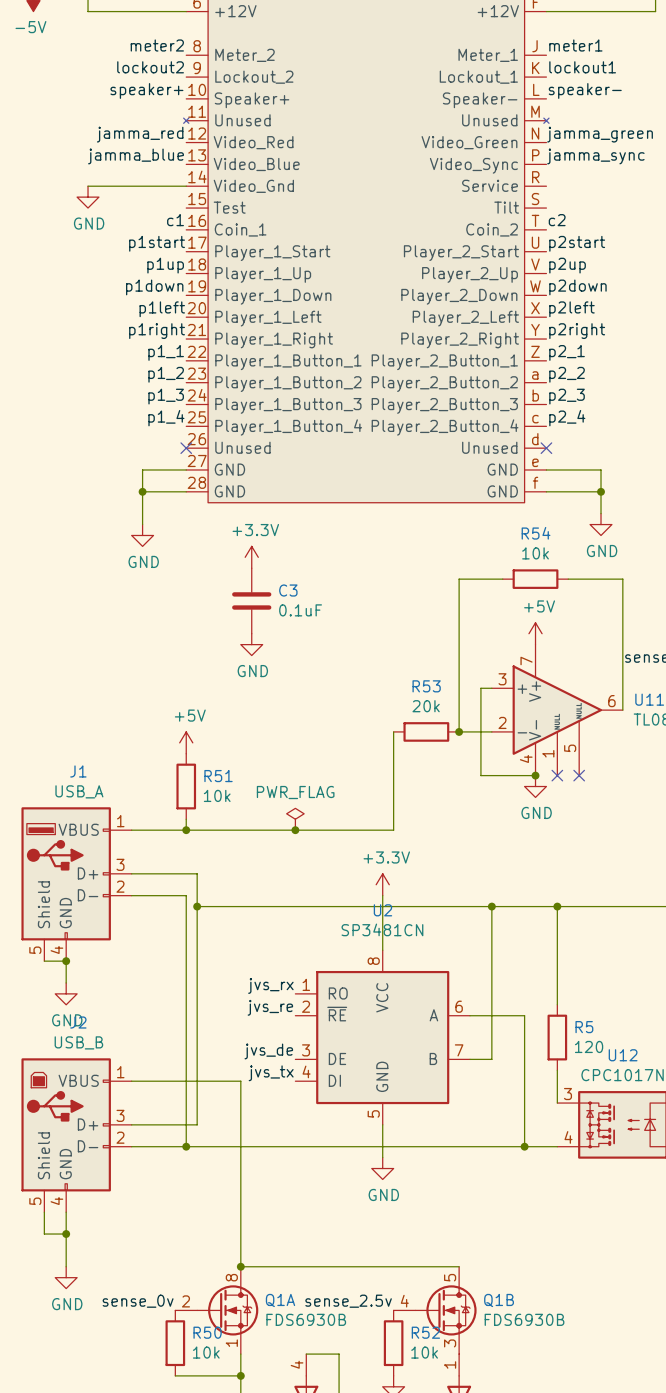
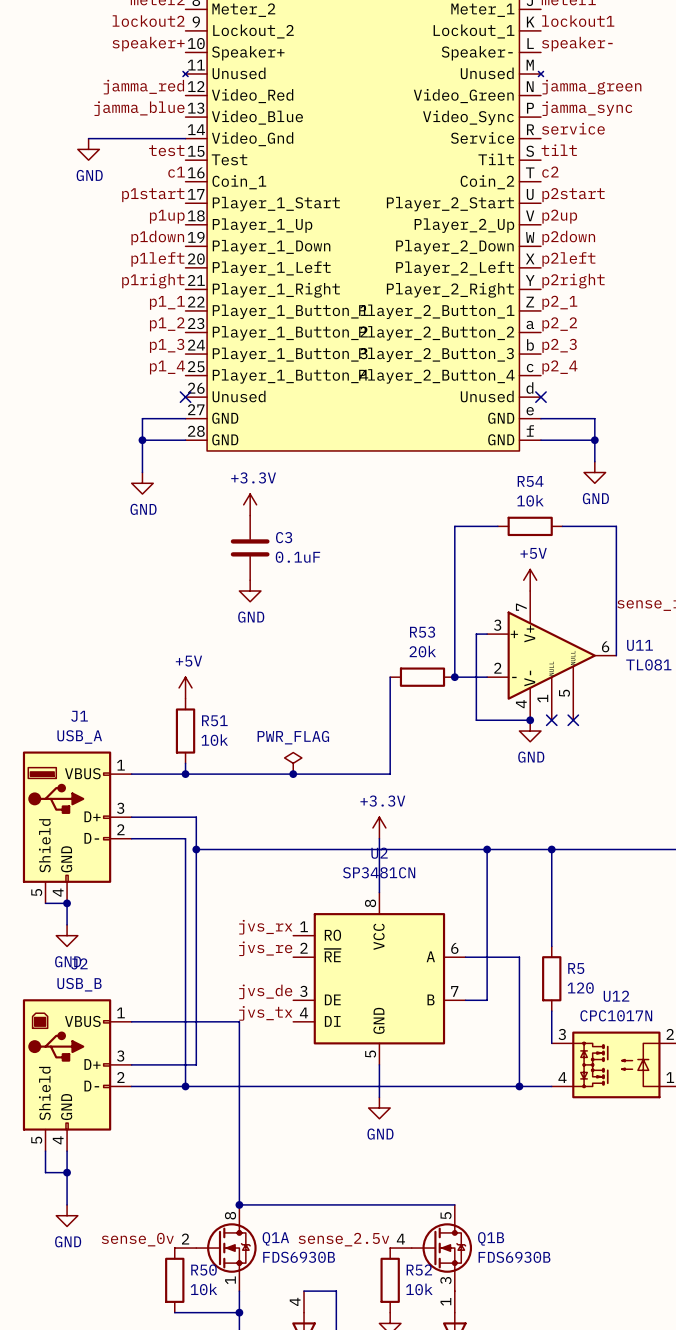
label: none -> service (573, 128)
label: none -> test (166, 150)
label: none -> tilt (559, 150)

